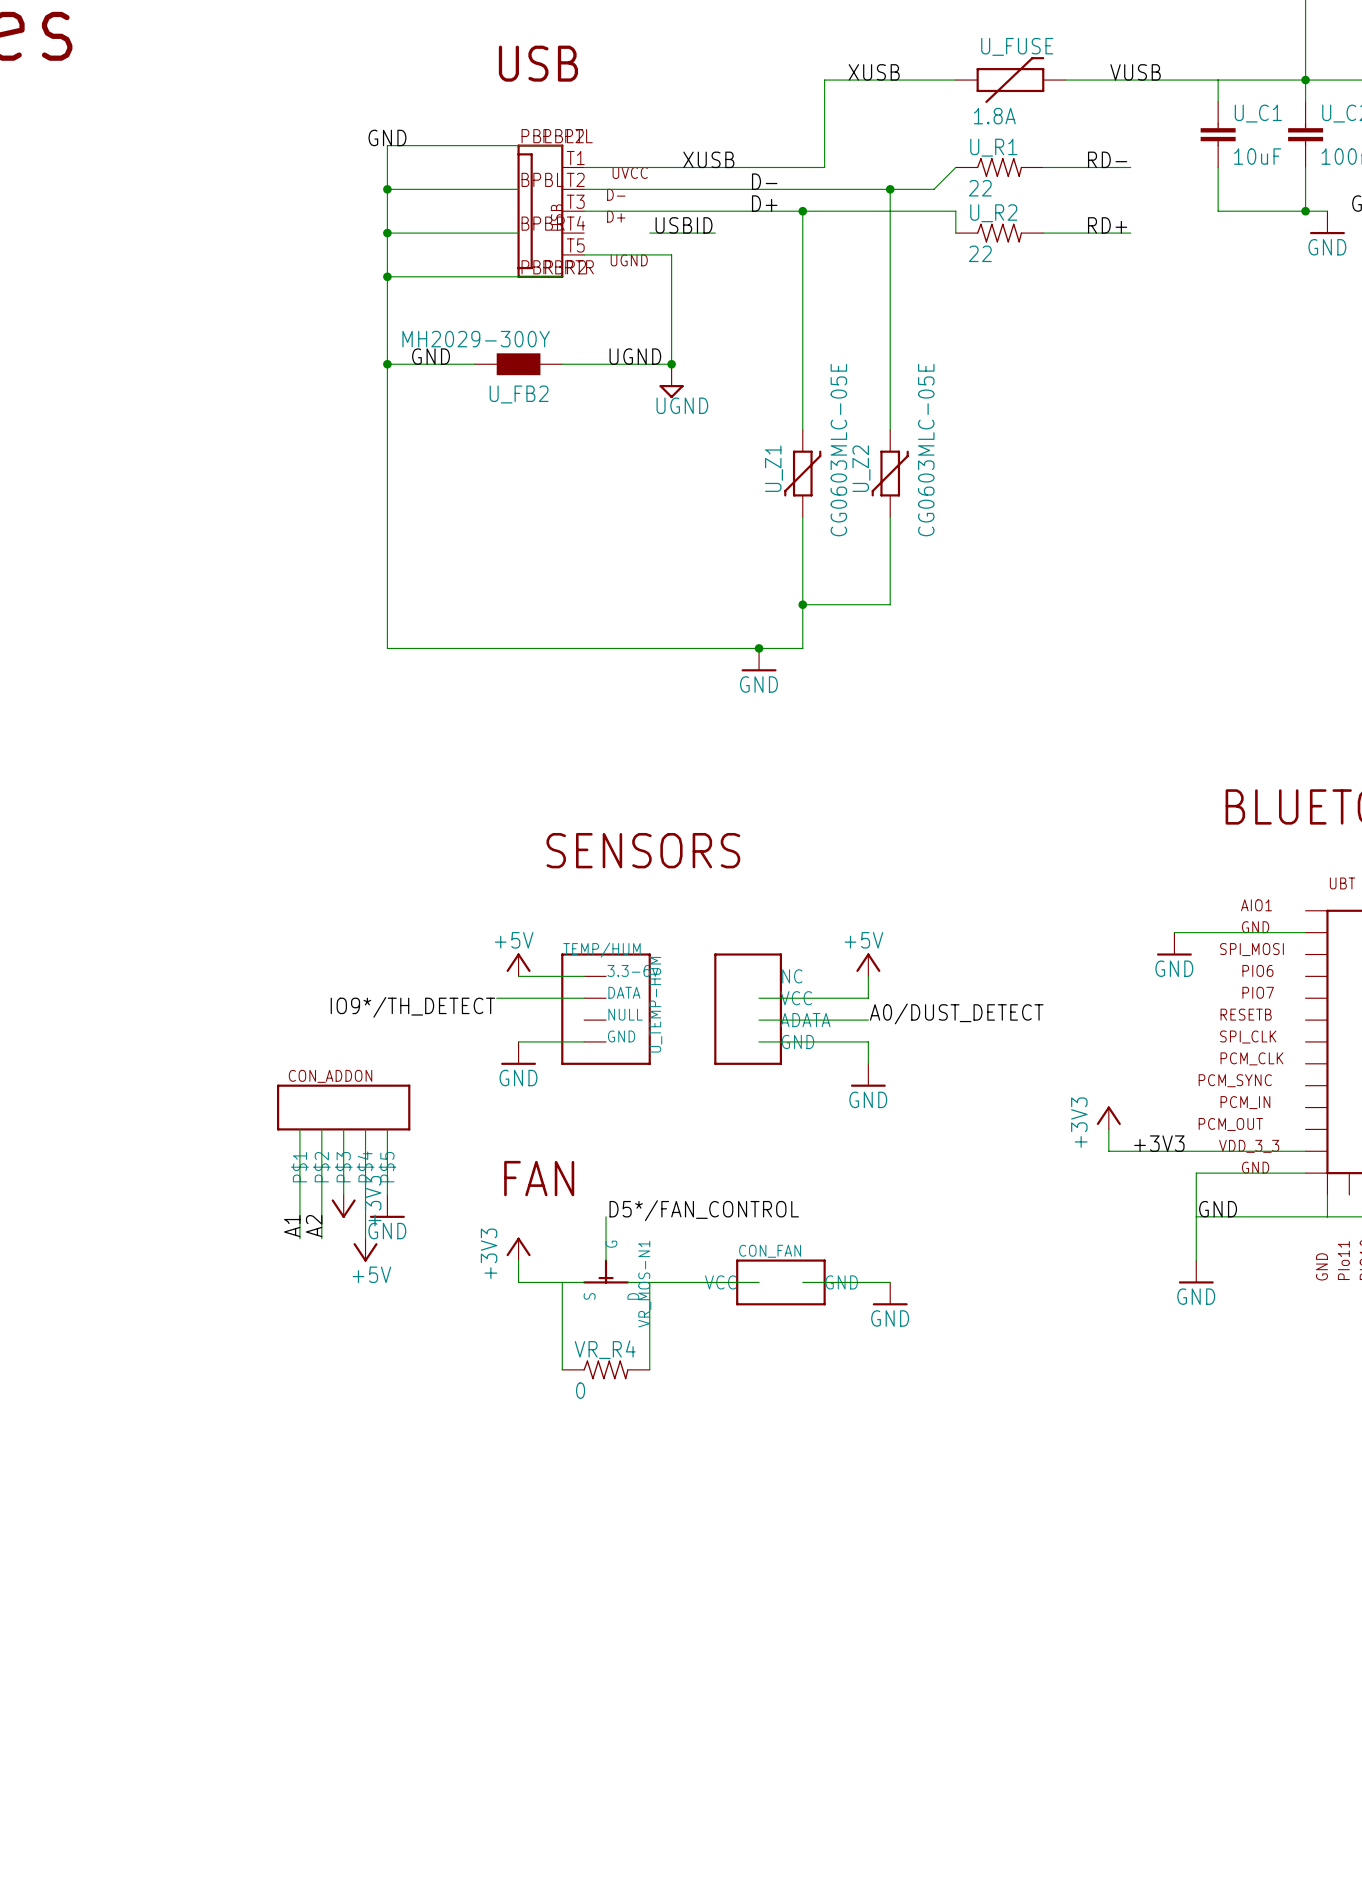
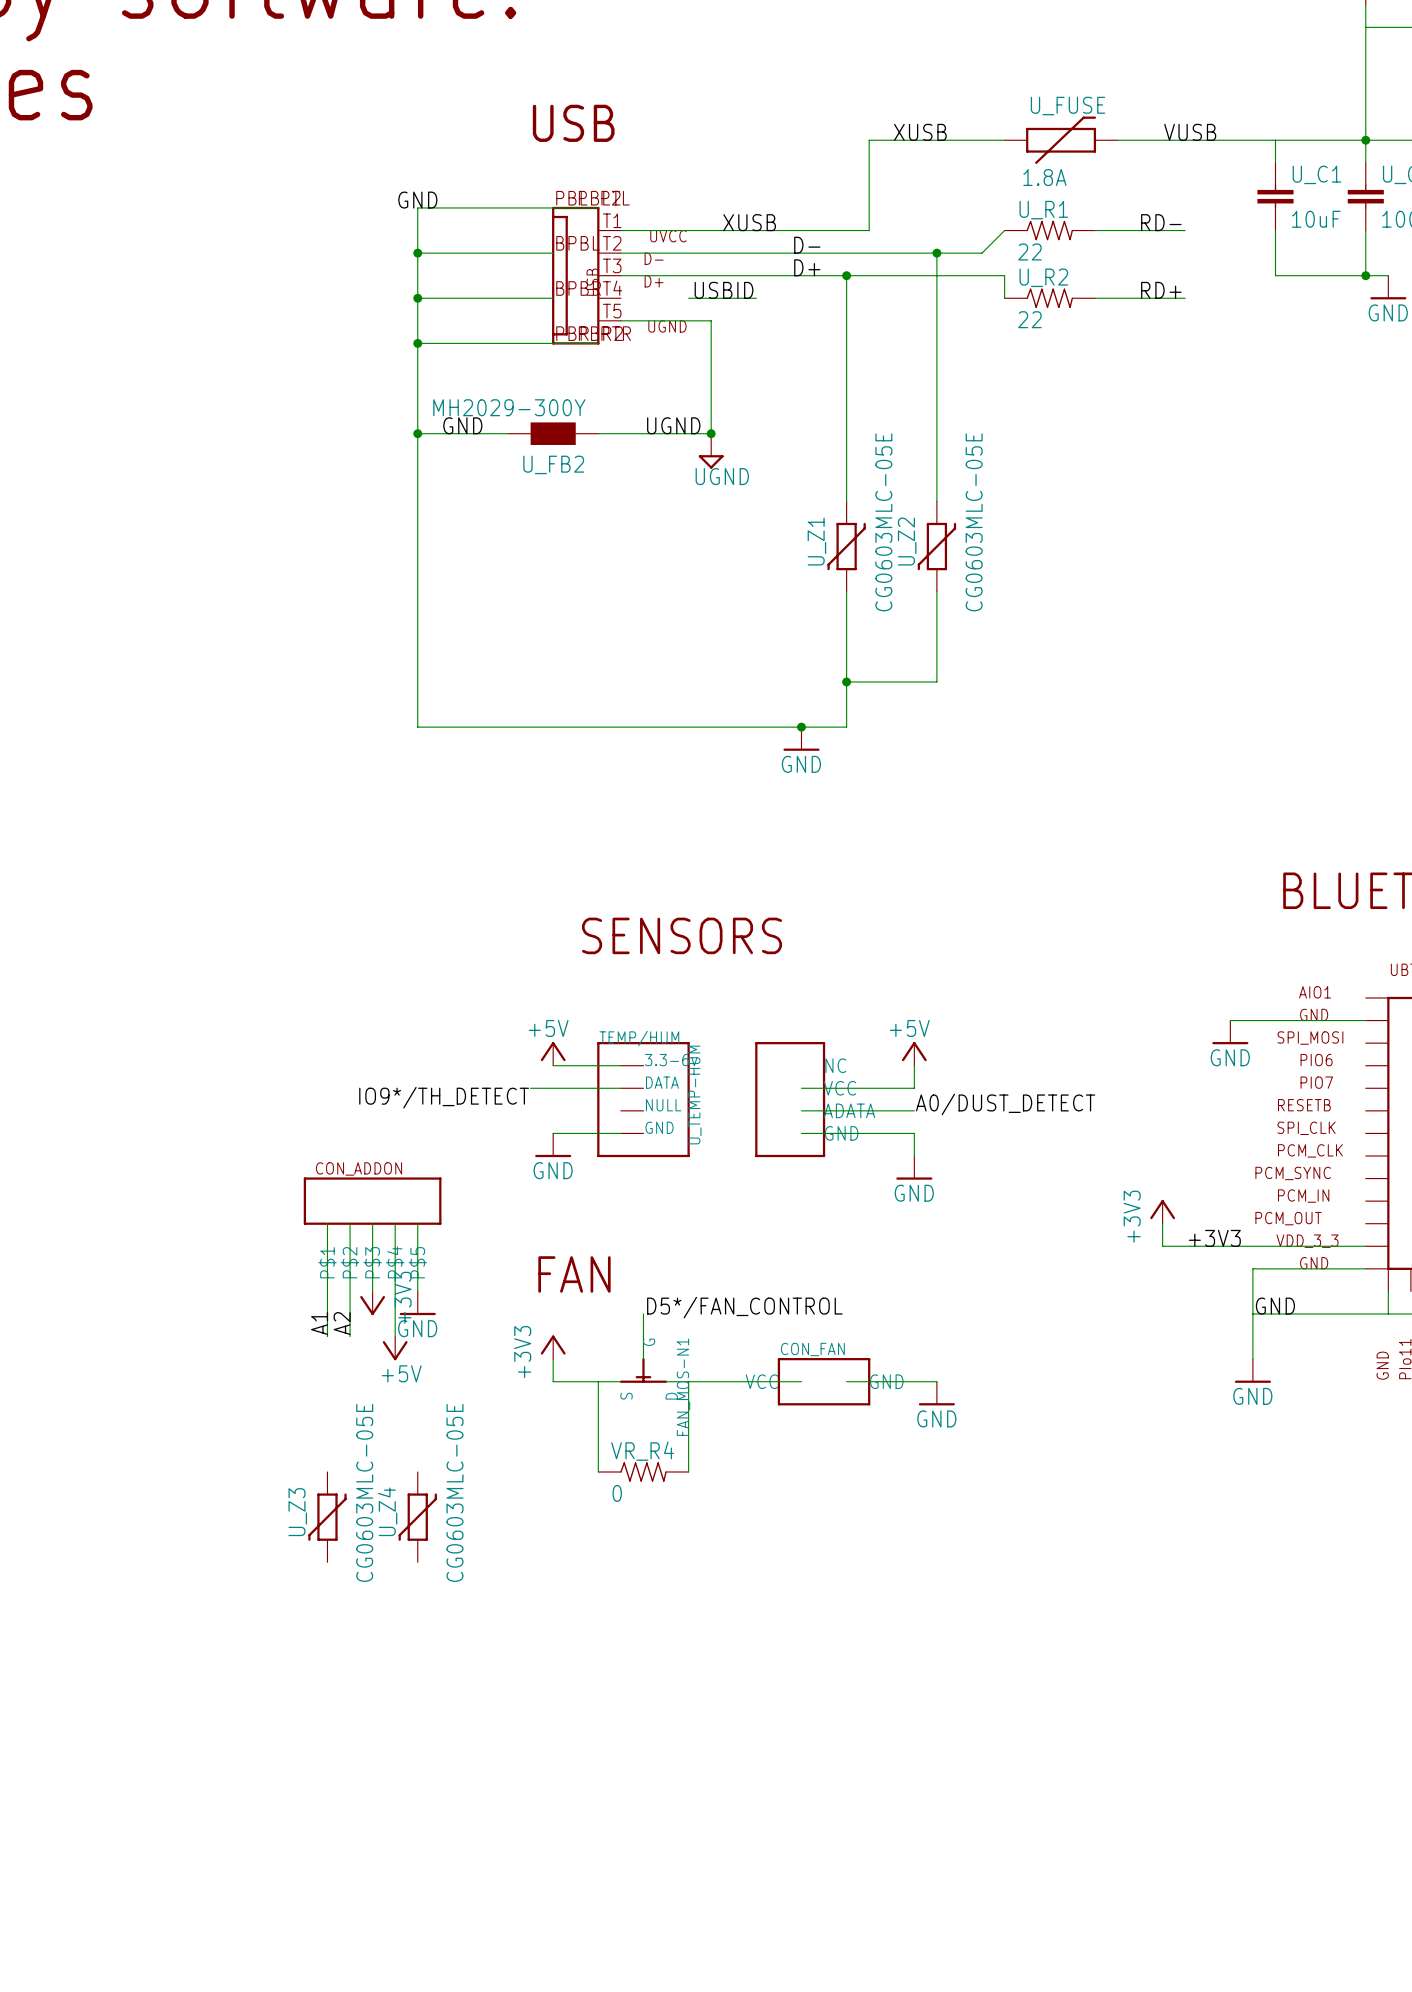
VR_MOS-N1 name: VR_MOS-N1 (644, 1284) -> FAN_MOS-N1 (683, 1387)
U_Z3: none -> CG0603MLC-05E (327, 1517)
U_Z4: none -> CG0603MLC-05E (417, 1517)

